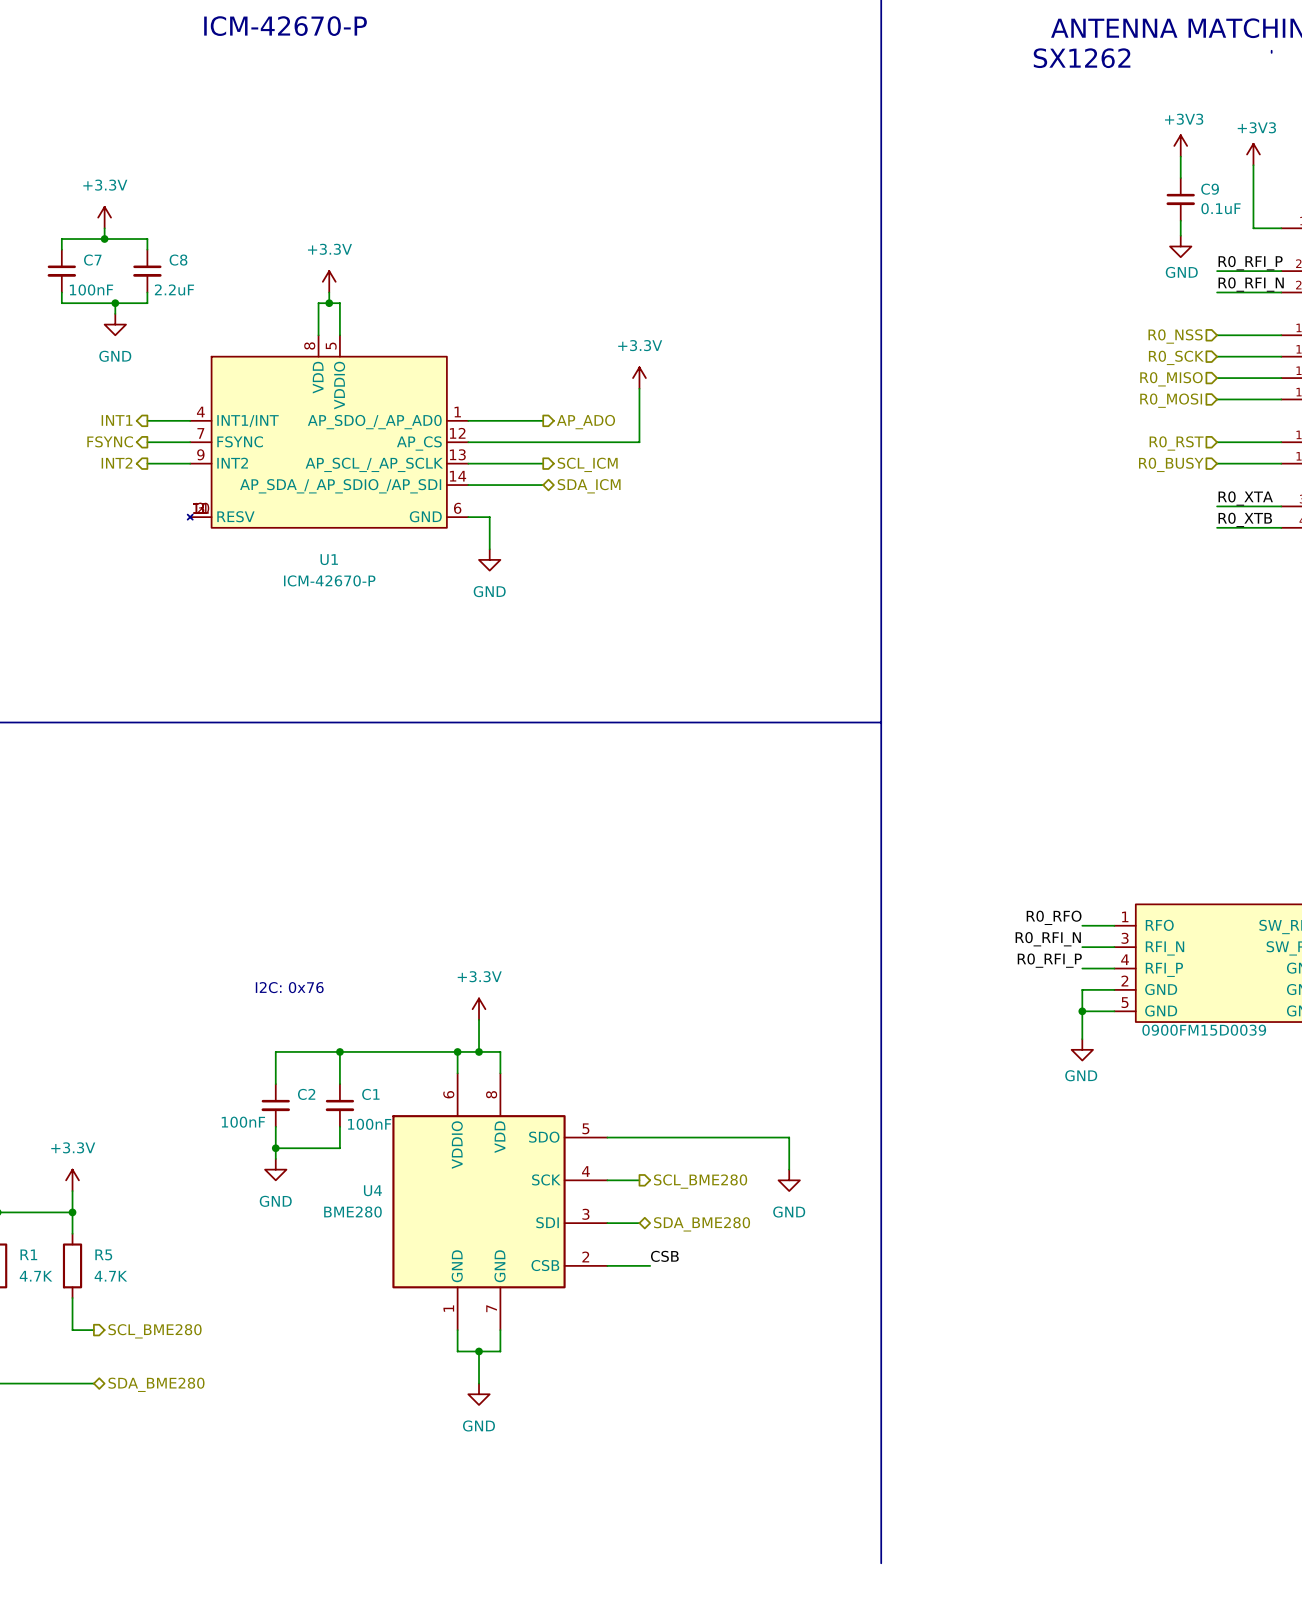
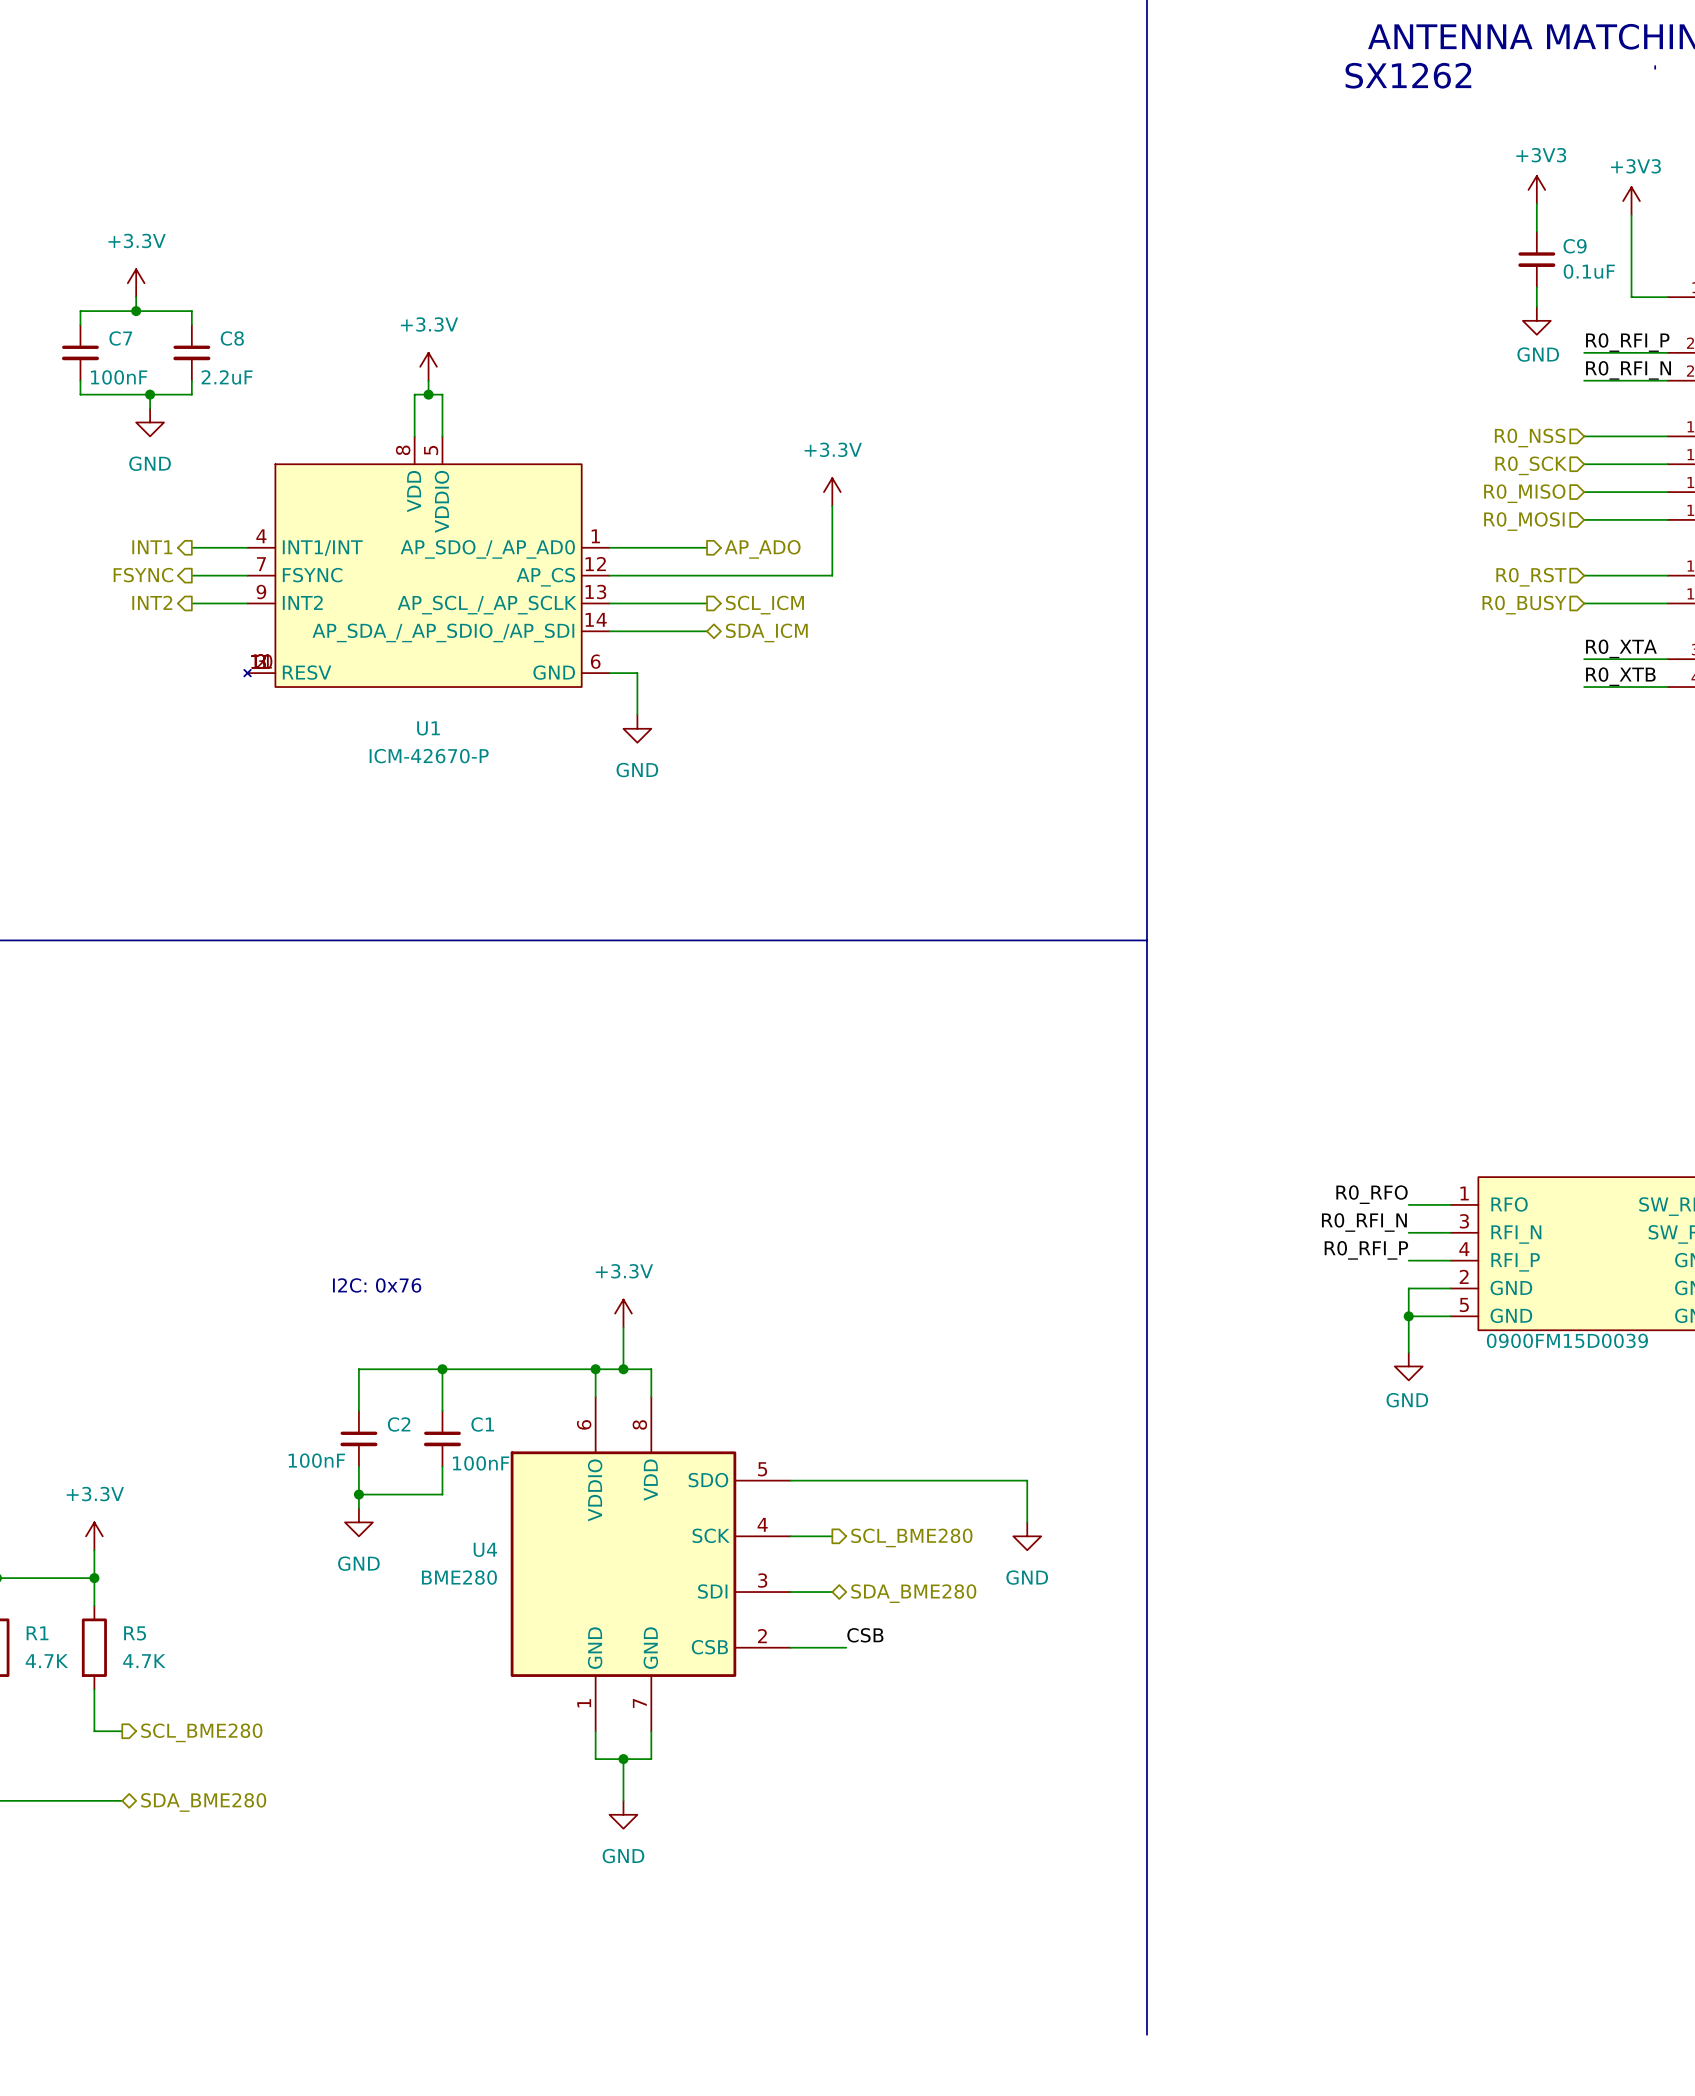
text: ICM-42670-P (285, 26) -> none

